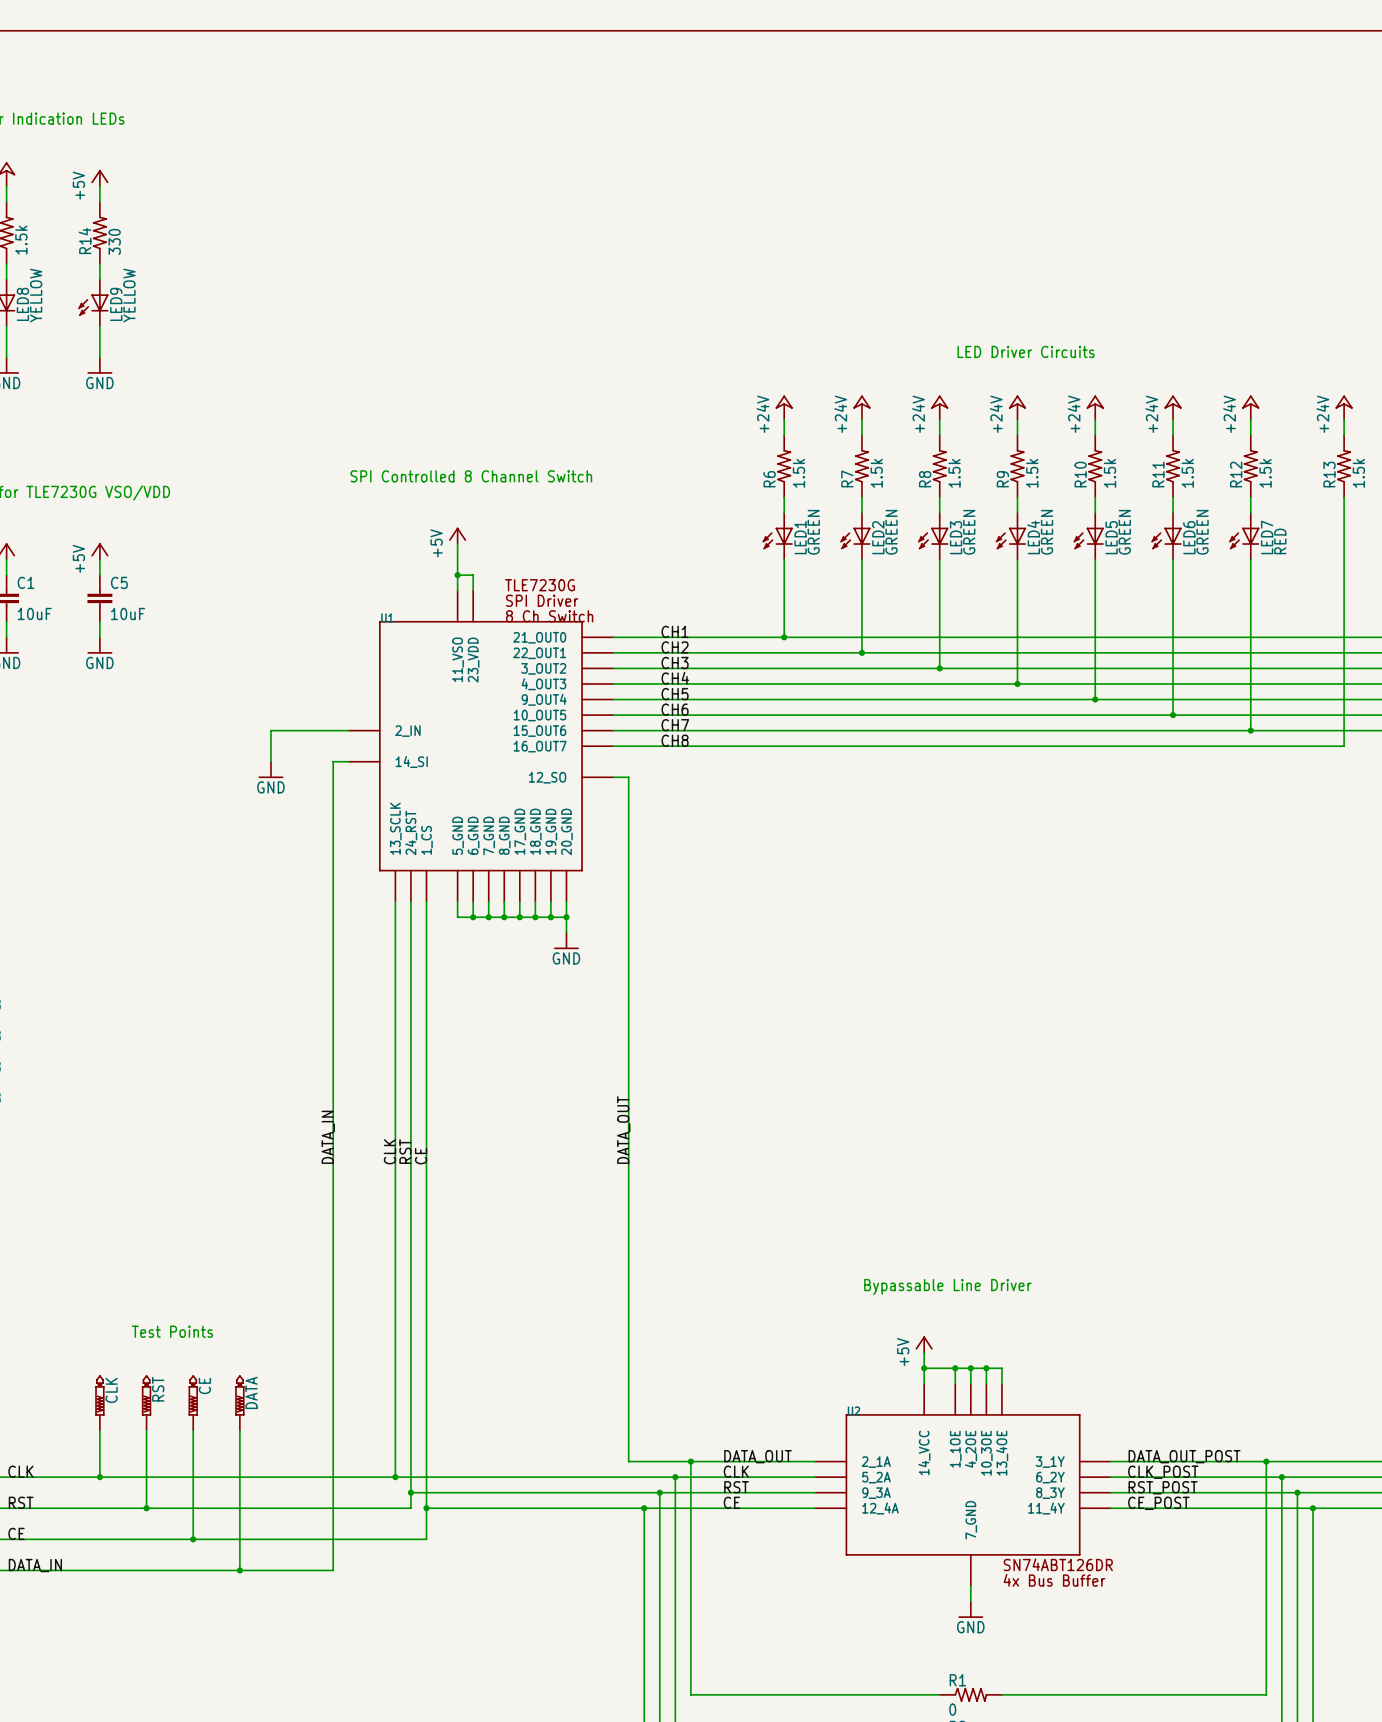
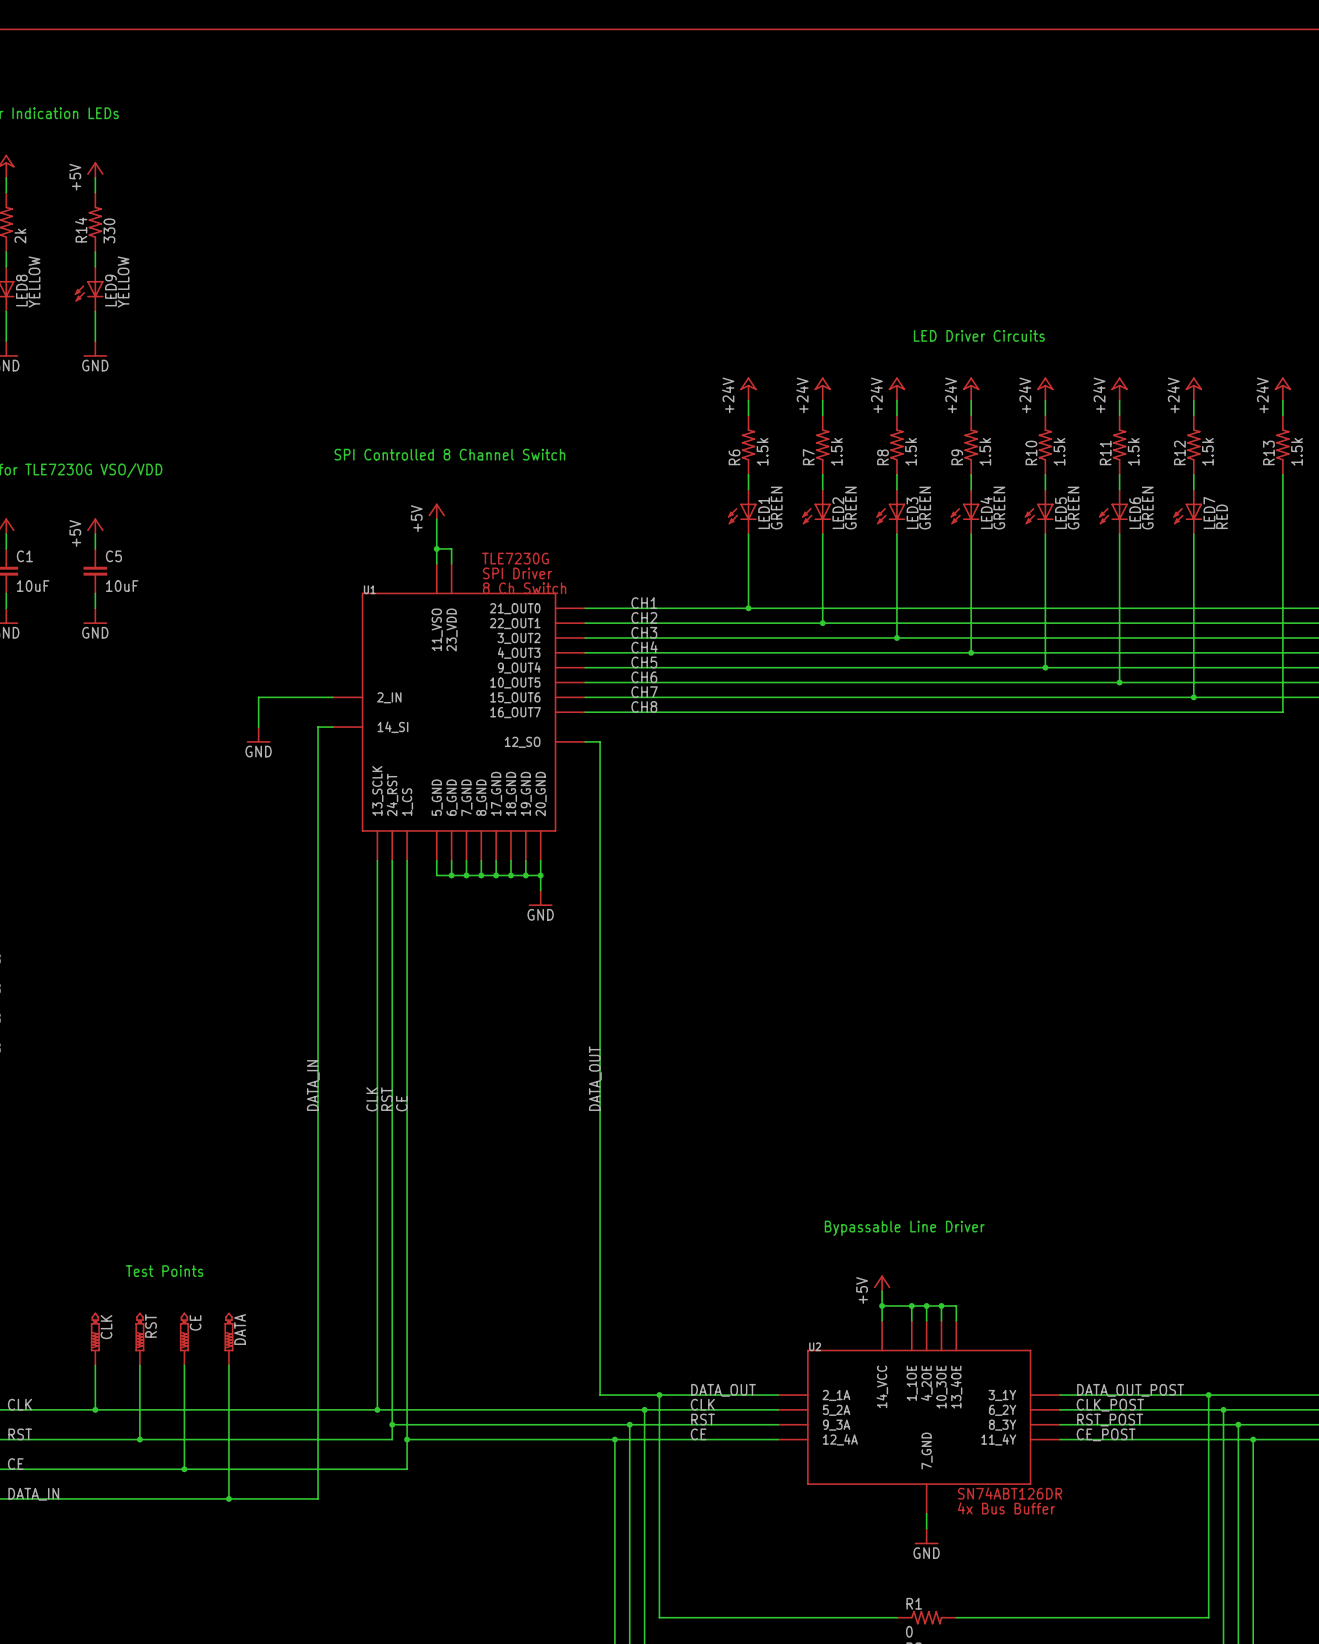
part value: 1.5k (21, 240) -> 2k (20, 236)

